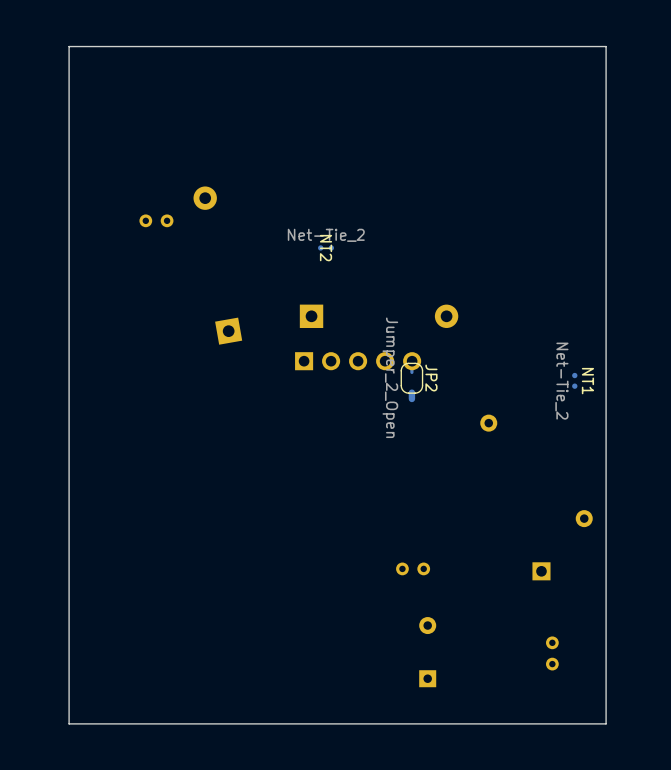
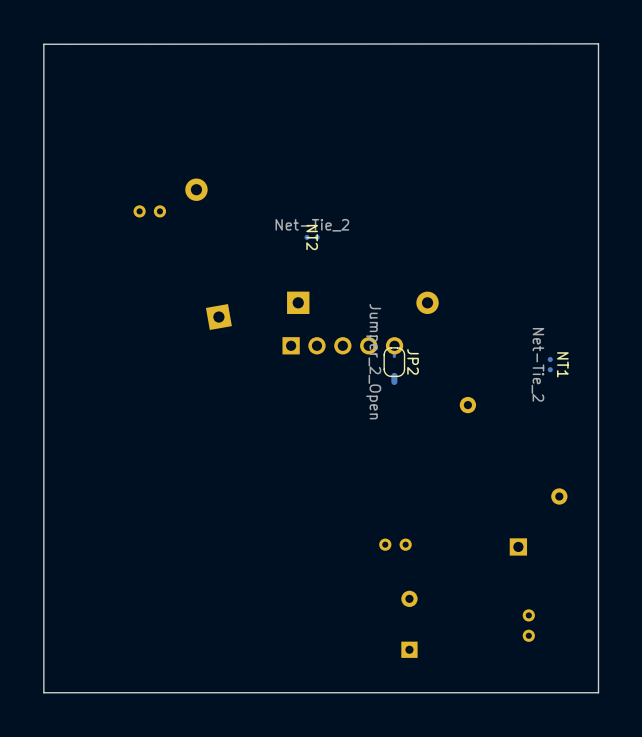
board edge: (606, 46) (606, 723) (69, 723) (69, 46) (606, 46) -> (598, 43) (598, 692) (43, 692) (43, 44) (598, 43)

